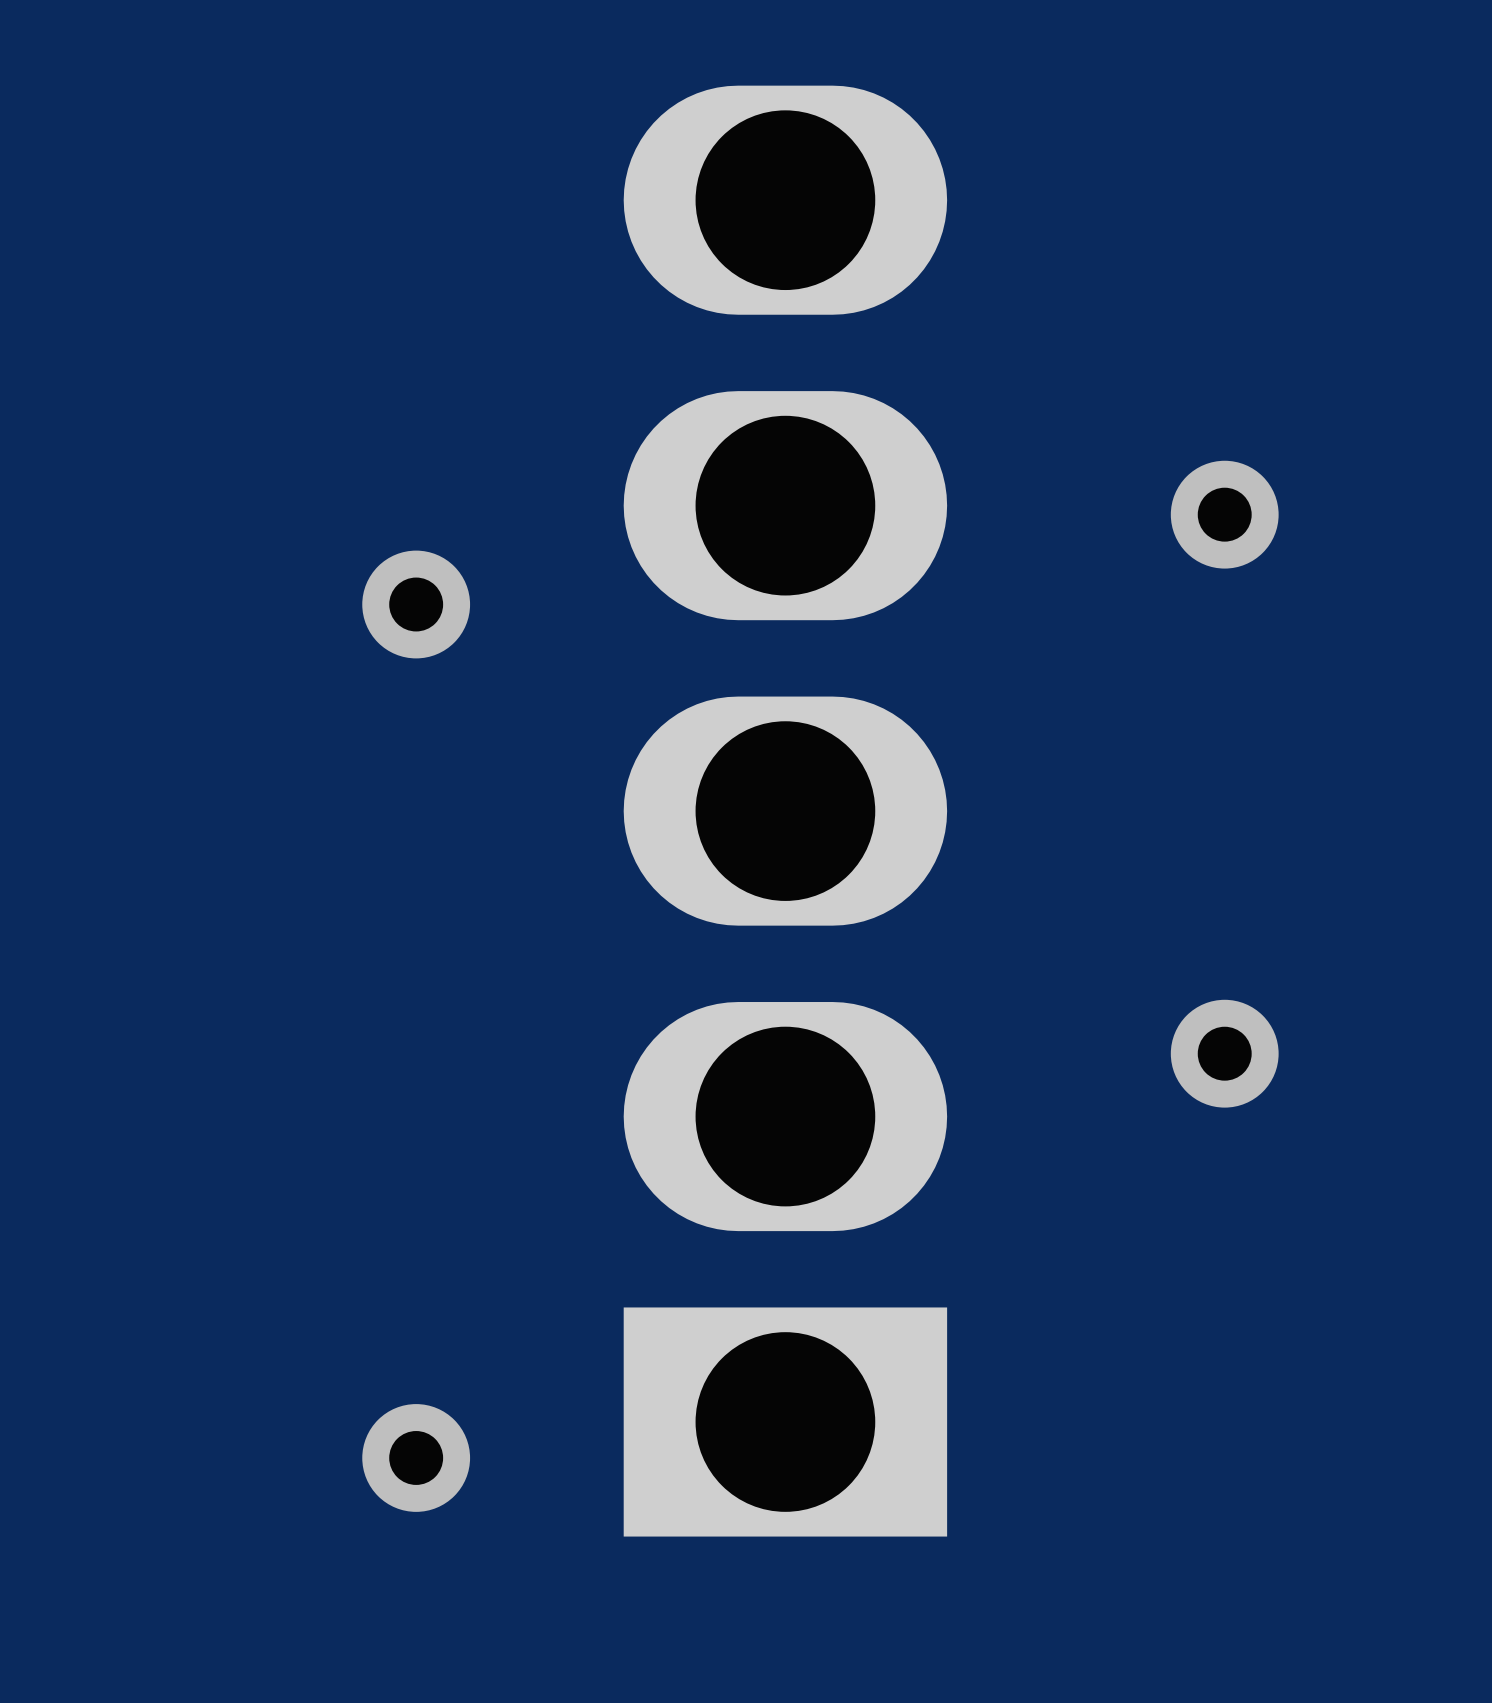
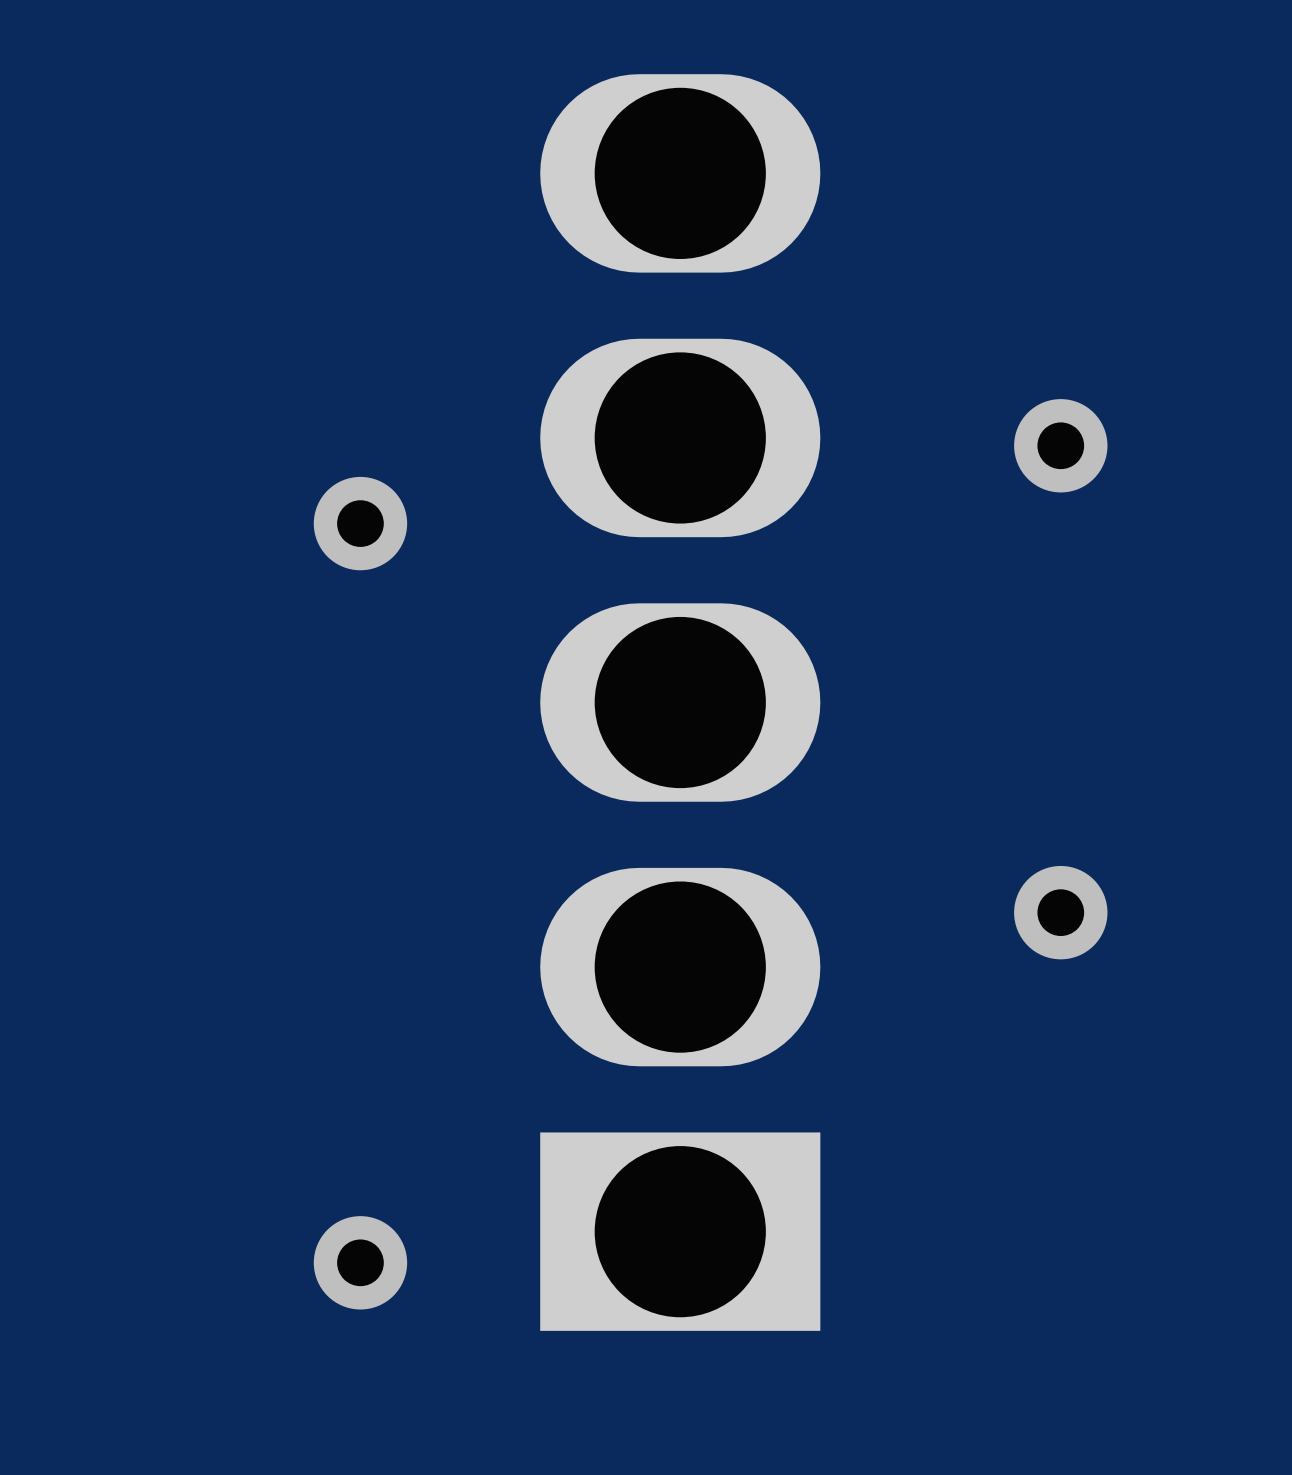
part footprint: [623, 85, 948, 1537] -> [540, 74, 821, 1331]

